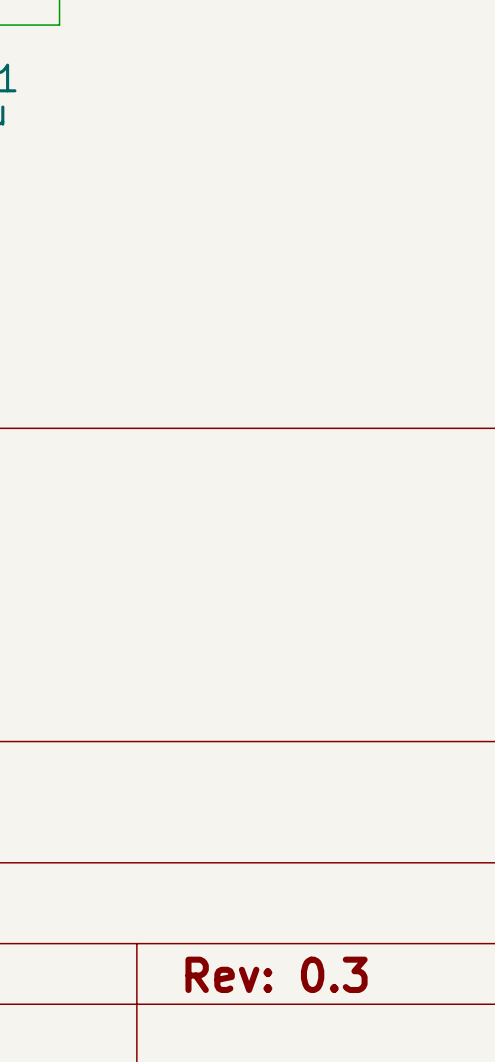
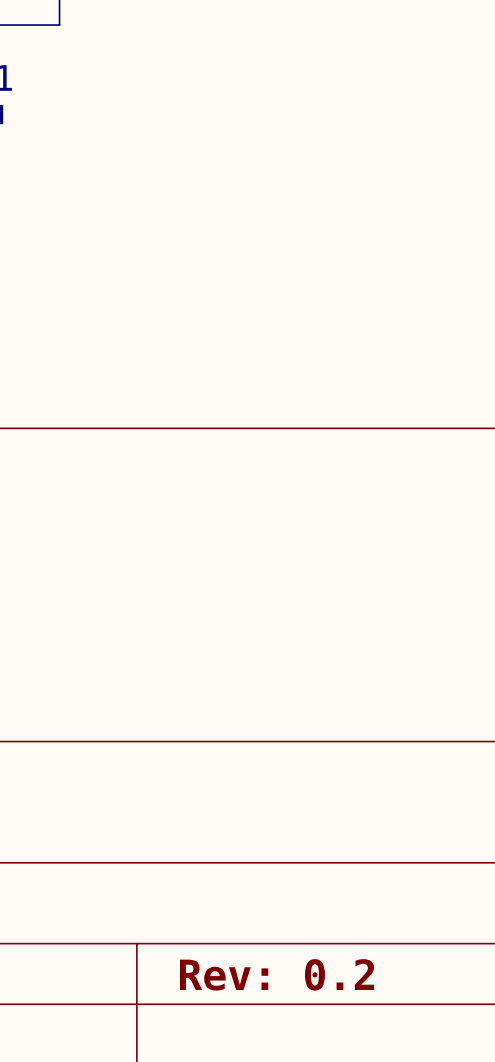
title block: Rev: 0.3 (276, 974) -> Rev: 0.2 (277, 974)

